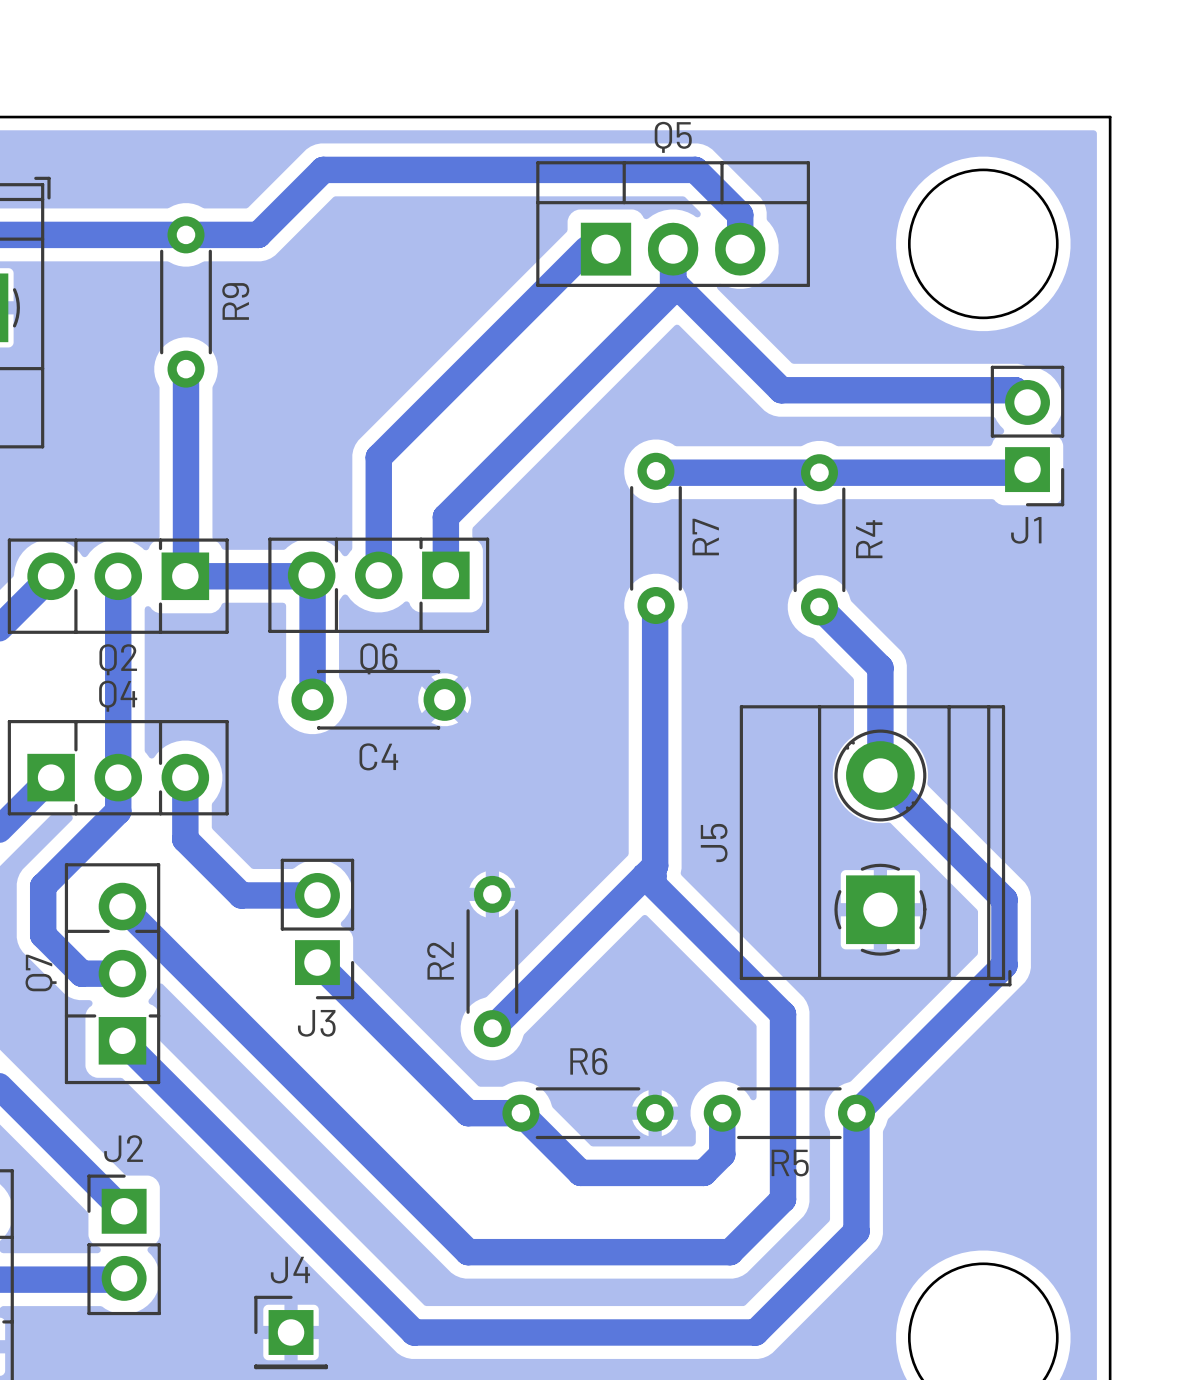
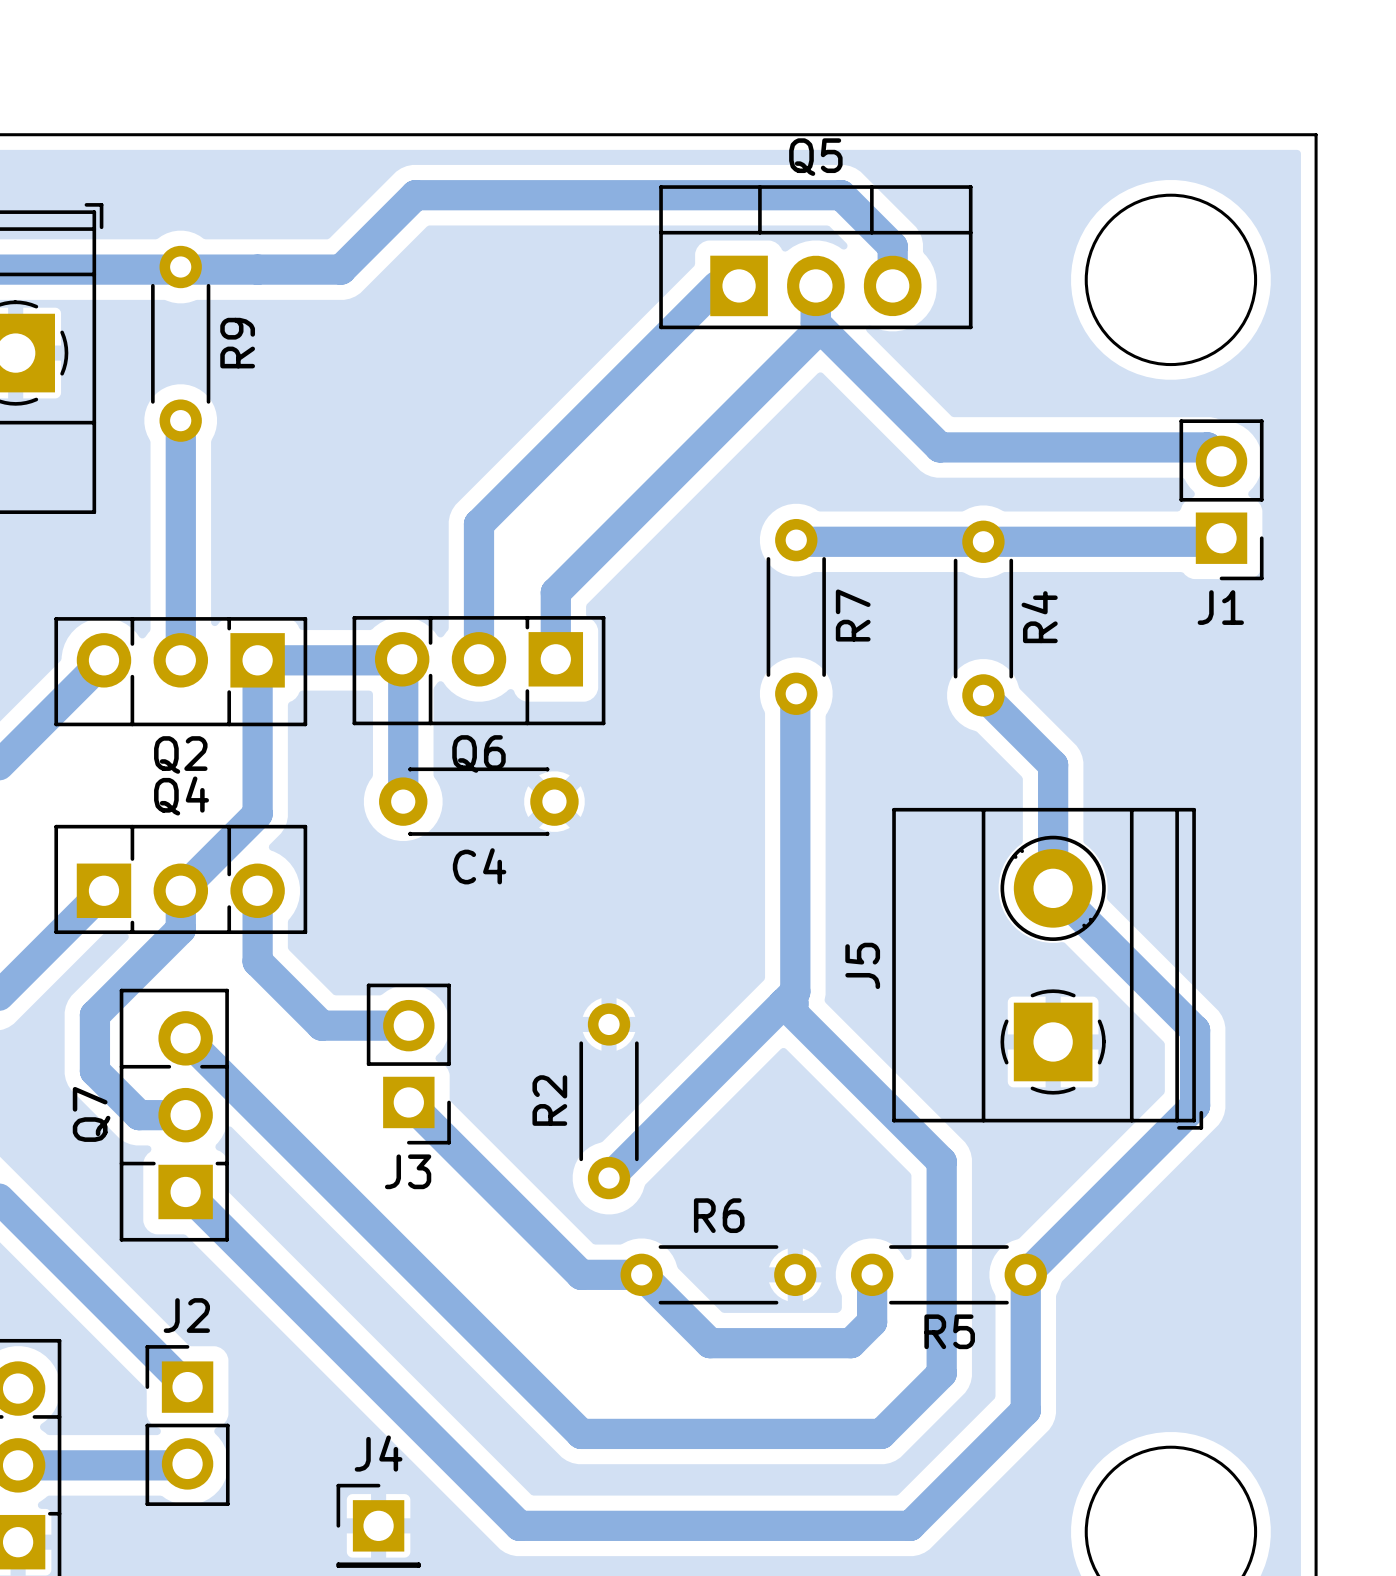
R9 position: (186, 302) -> (180, 343)
bottom track: none -> (180, 420) (180, 660)
bottom track: (186, 369) (185, 576) -> none
bottom track: (118, 576) (118, 777) -> (257, 660) (257, 813) (180, 890)

